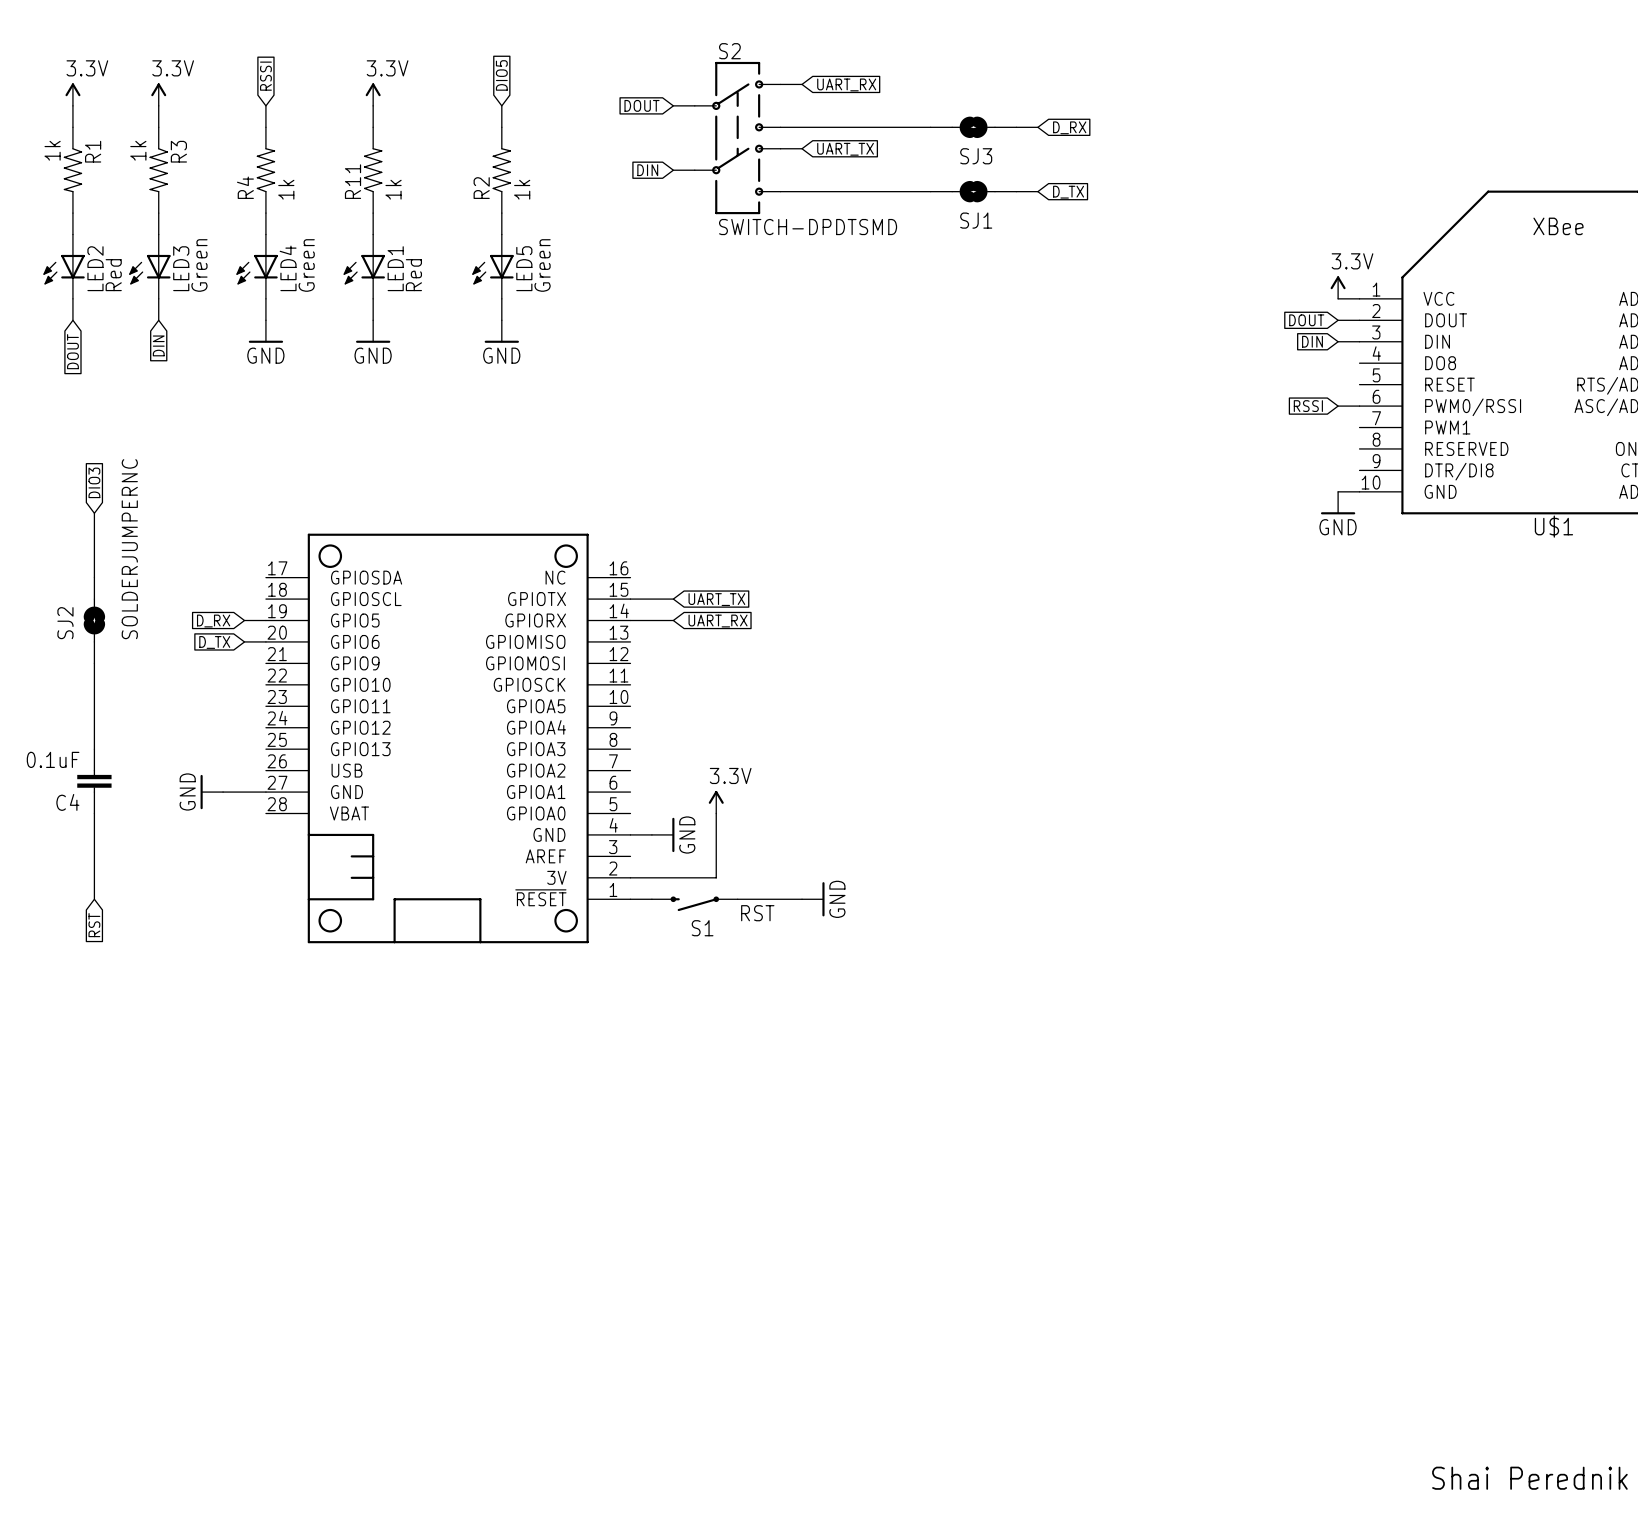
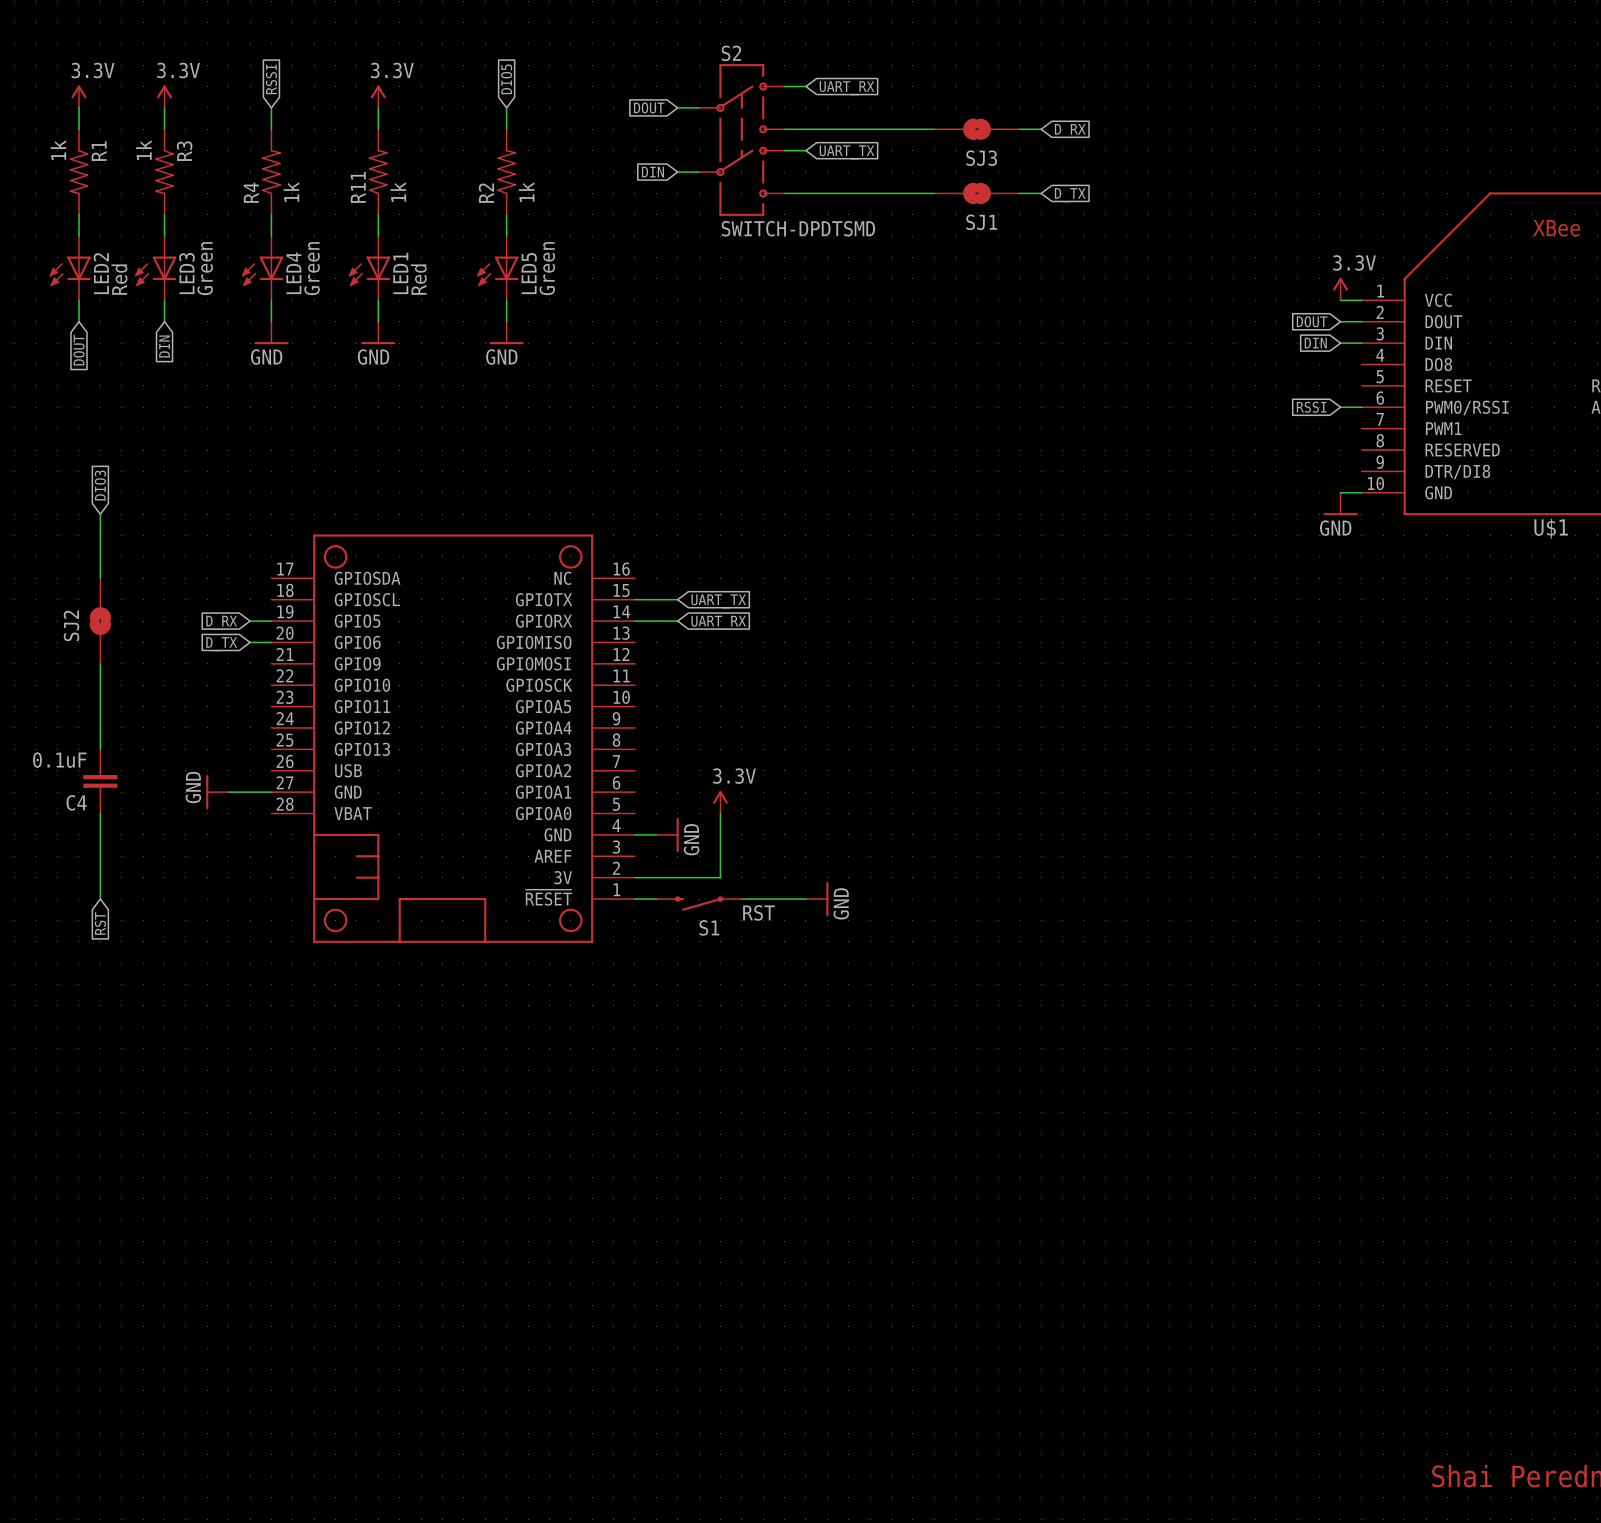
SJ2 value: SOLDERJUMPERNC (129, 549) -> none

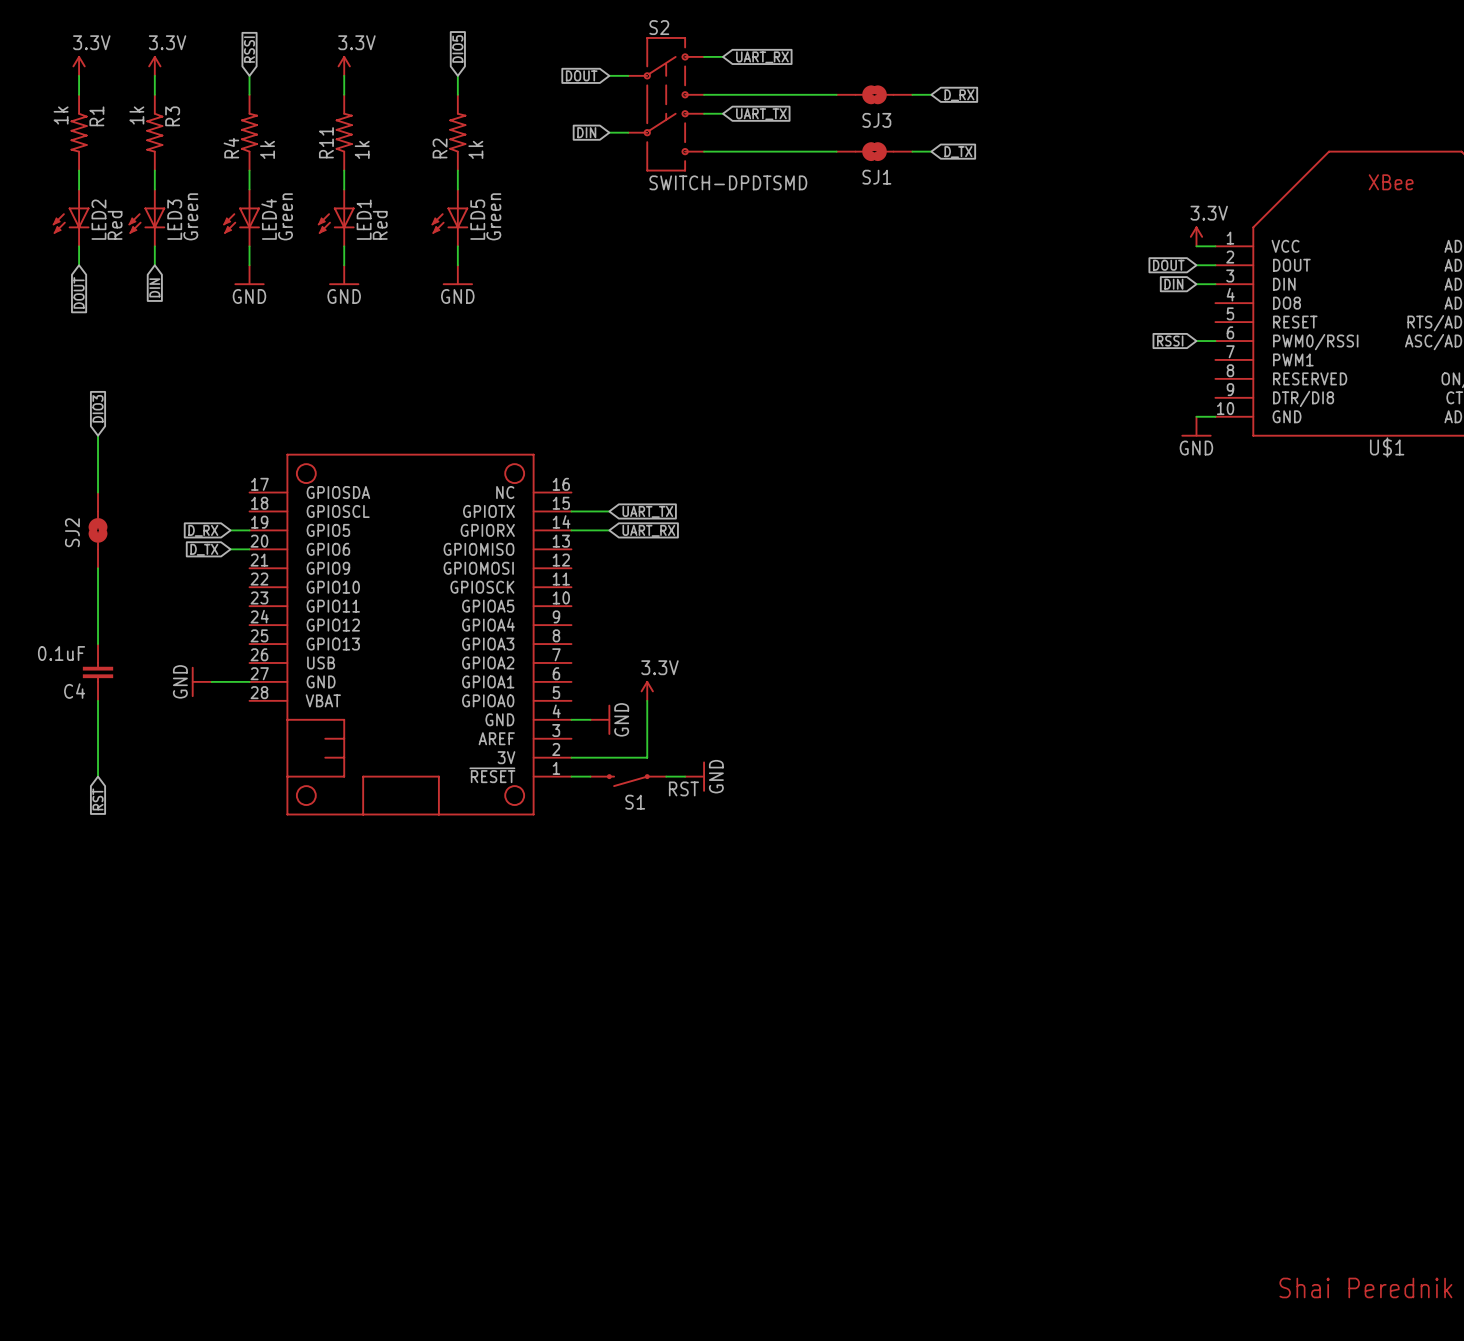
power symbol position: GND (817, 899) -> GND (695, 776)

